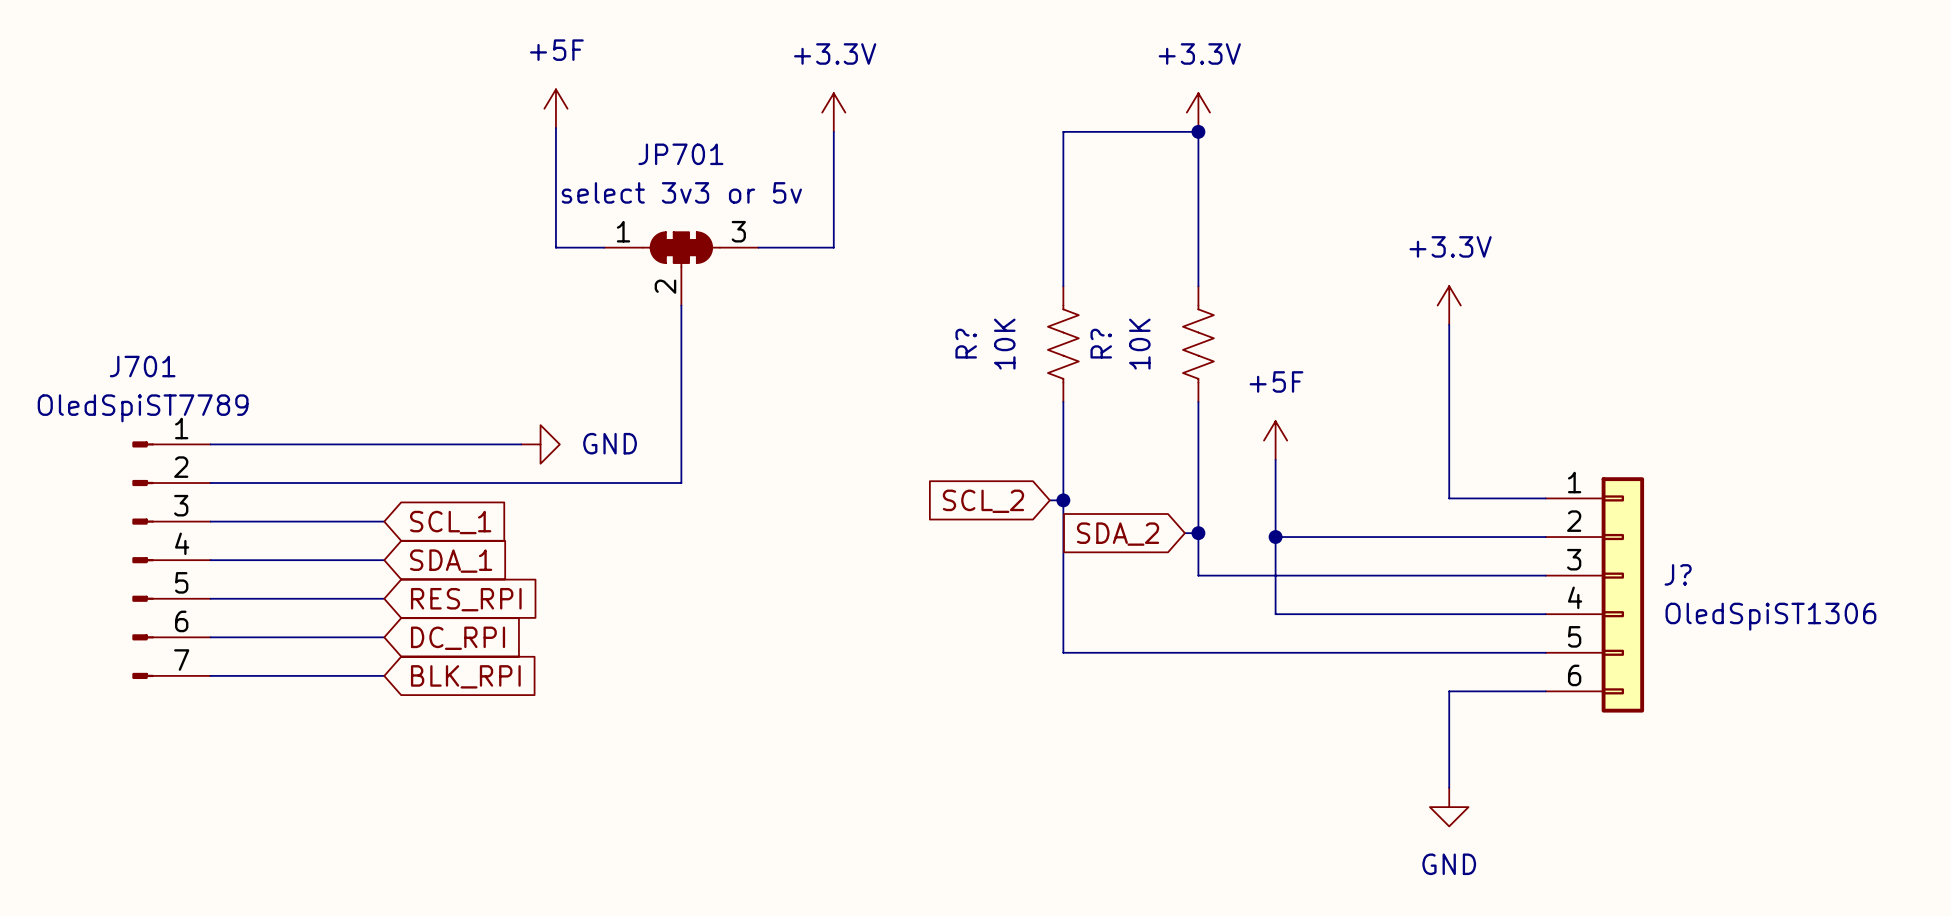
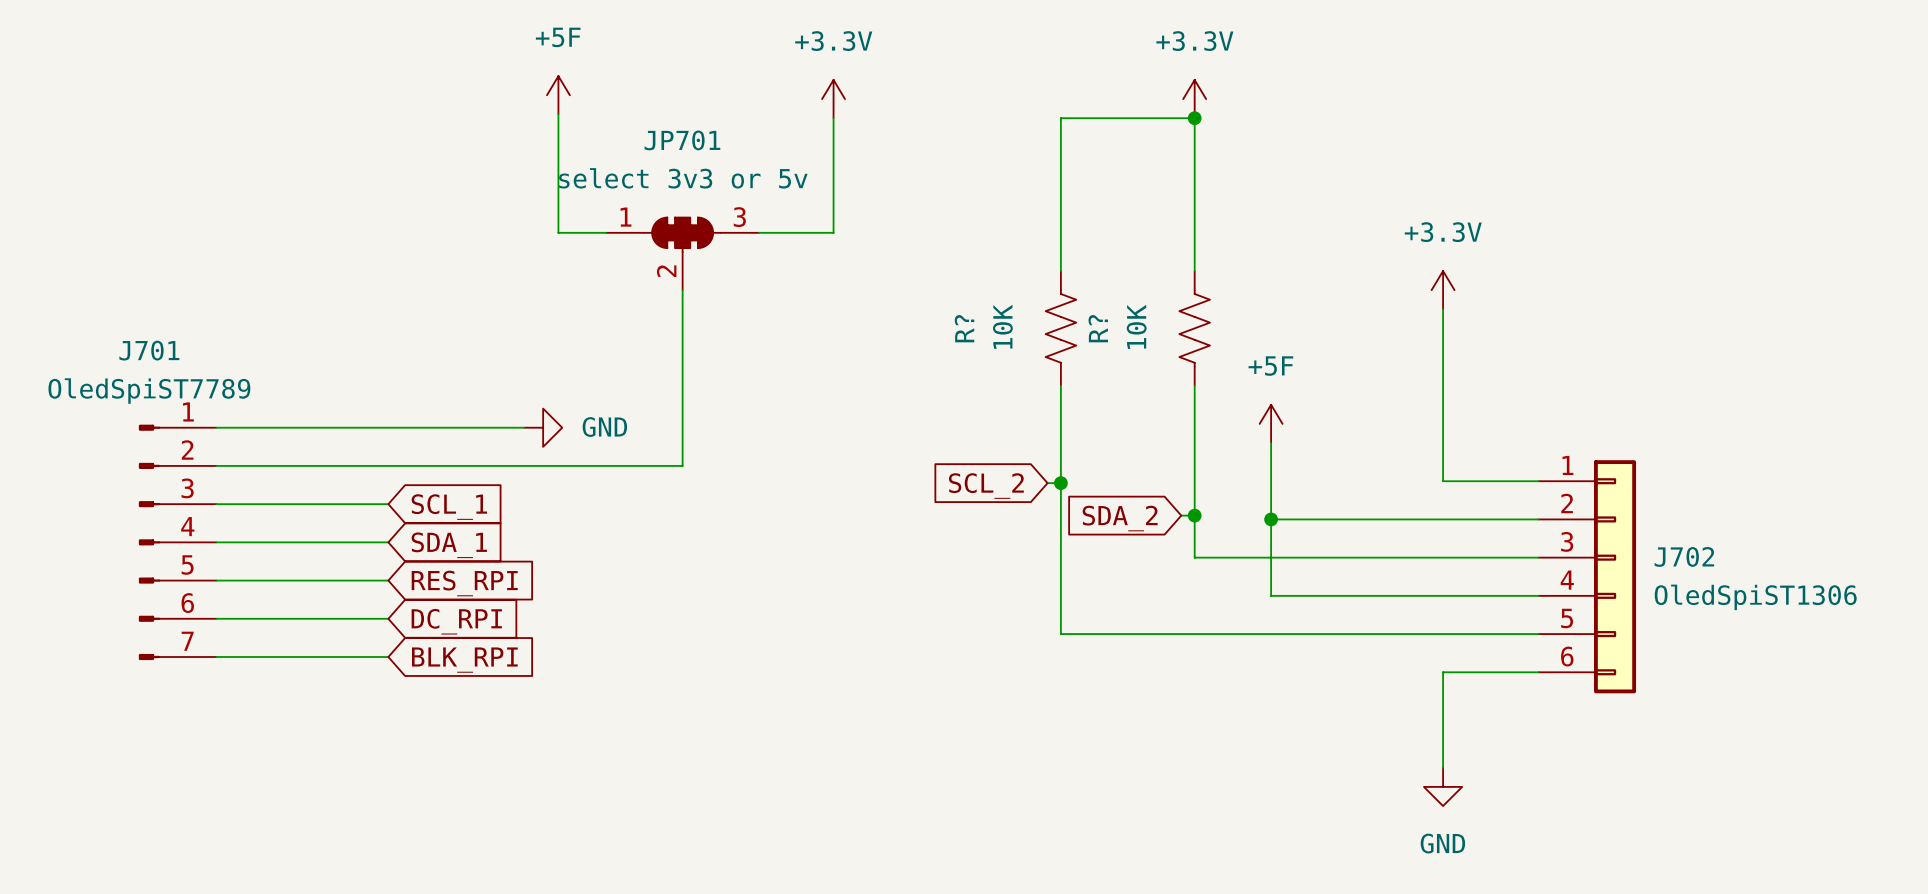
J? name: J? (1678, 574) -> J702 (1684, 556)

